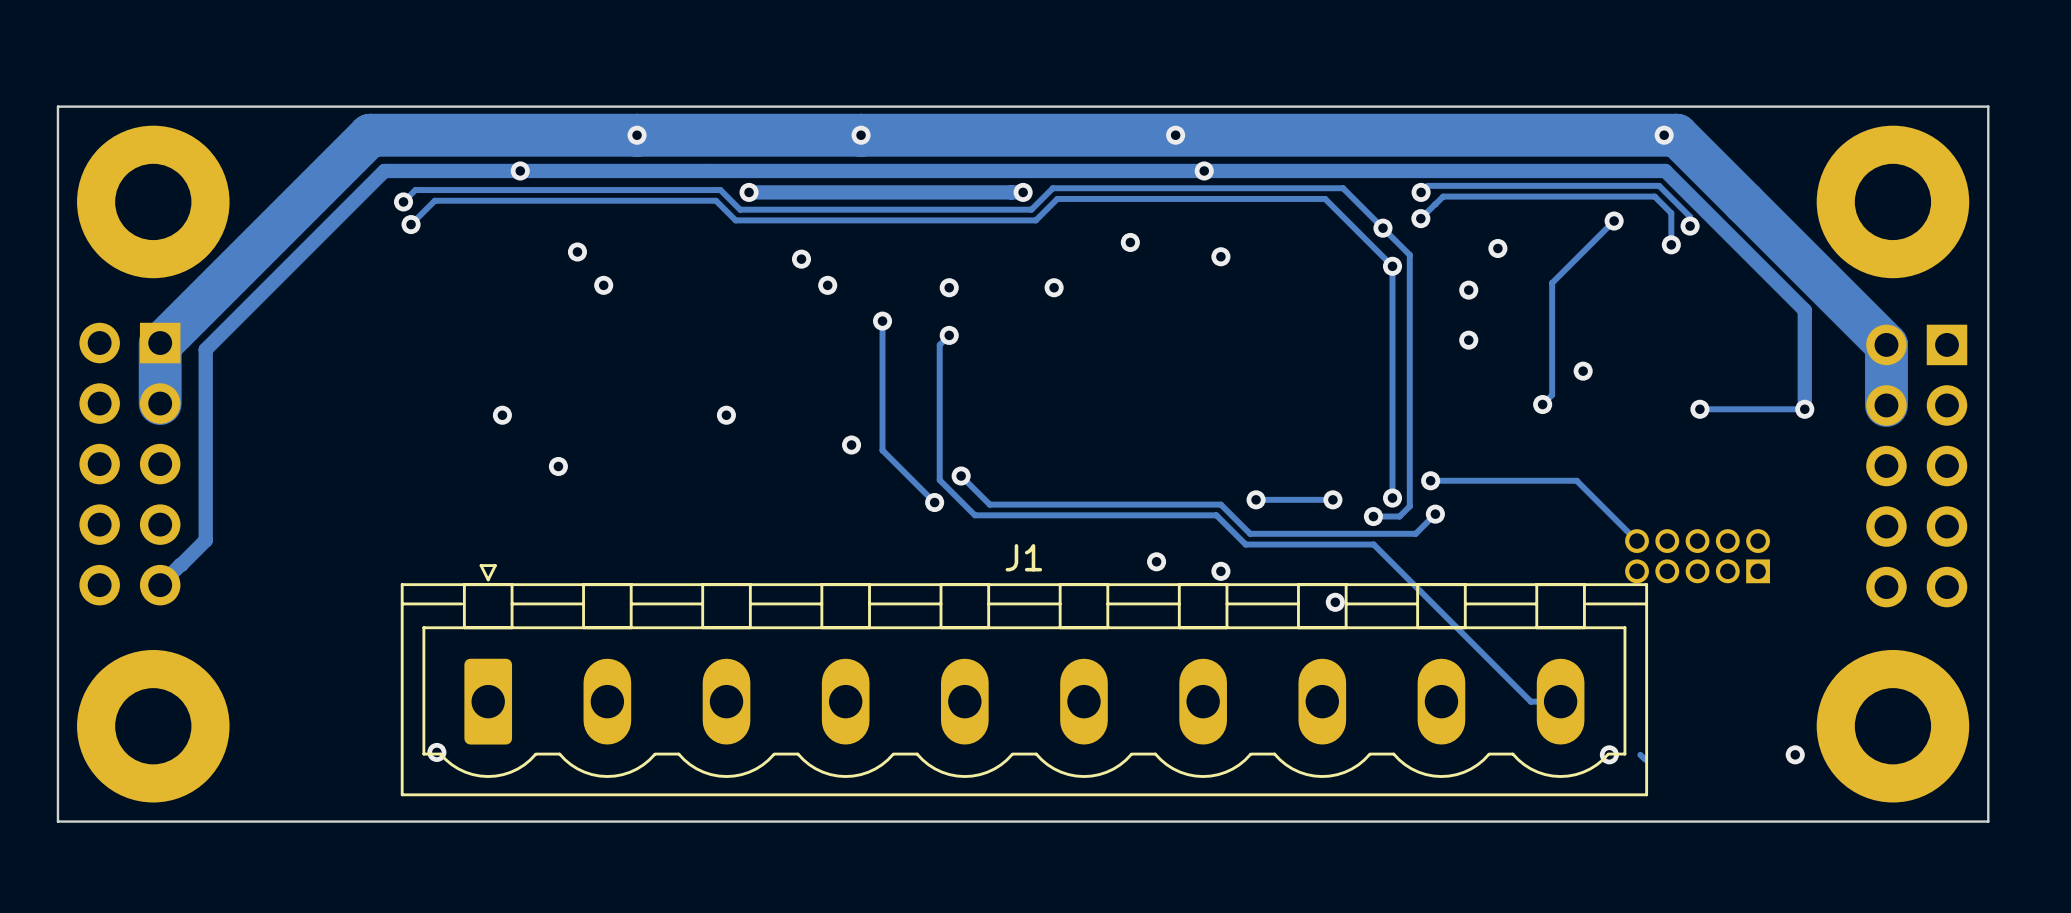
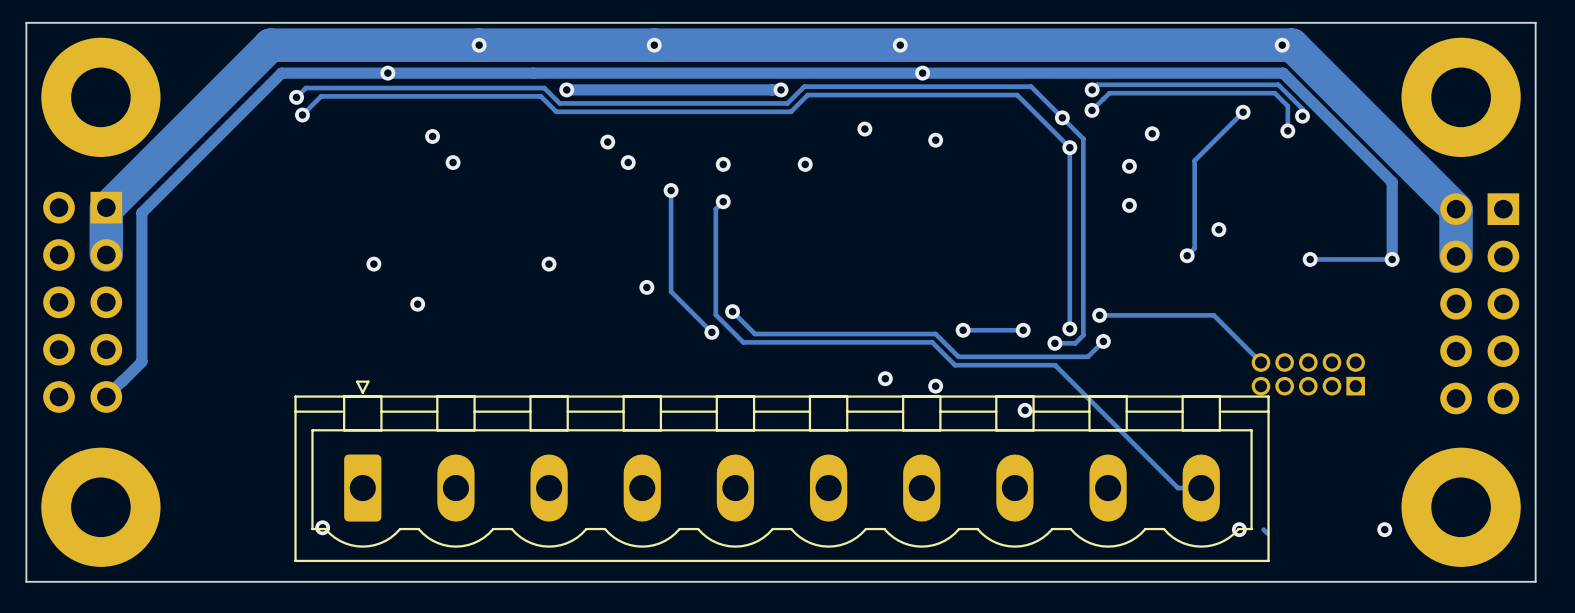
J1 name: J1 (1023, 557) -> none

